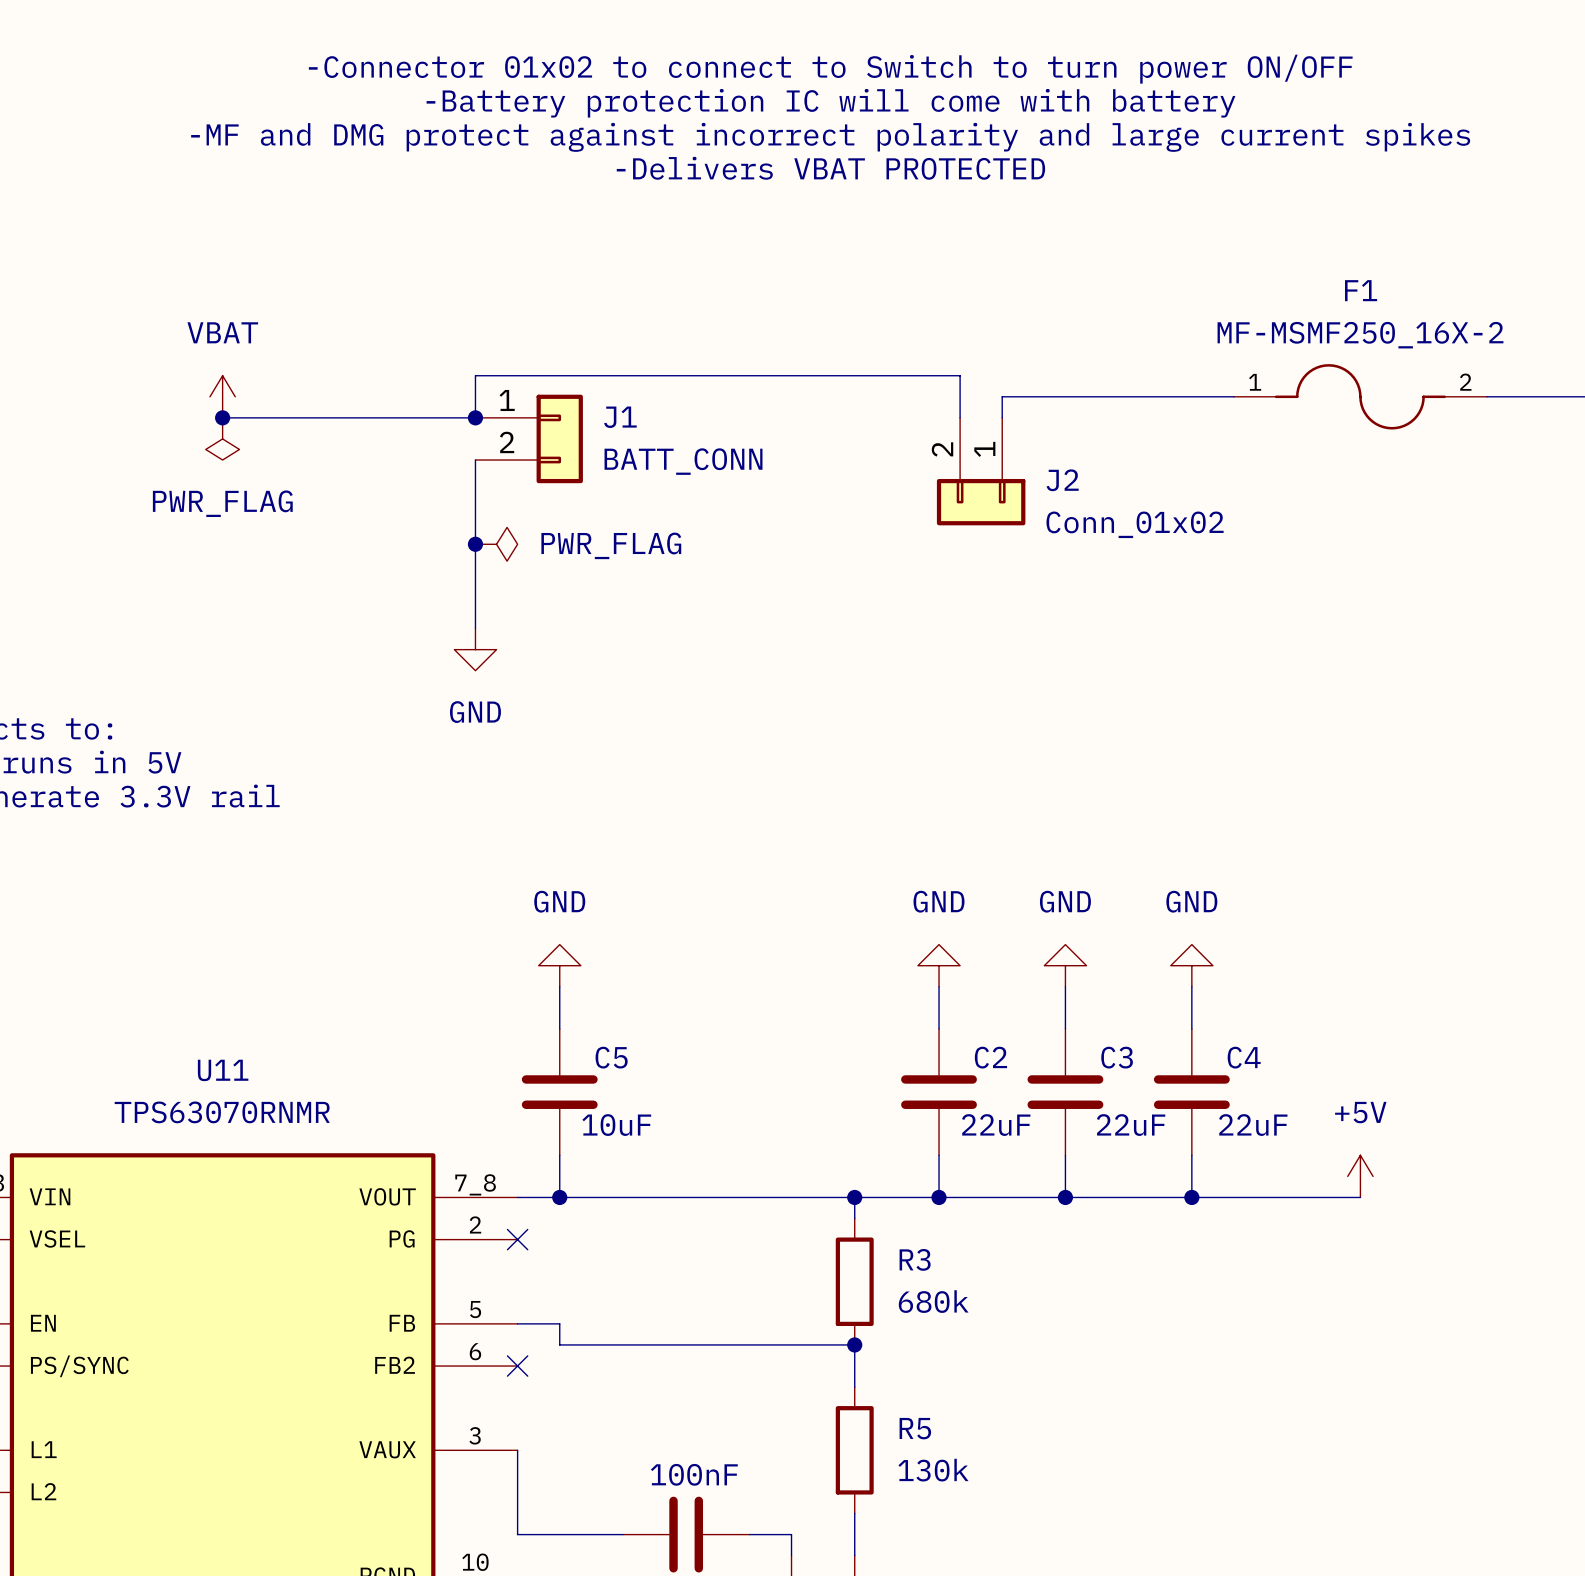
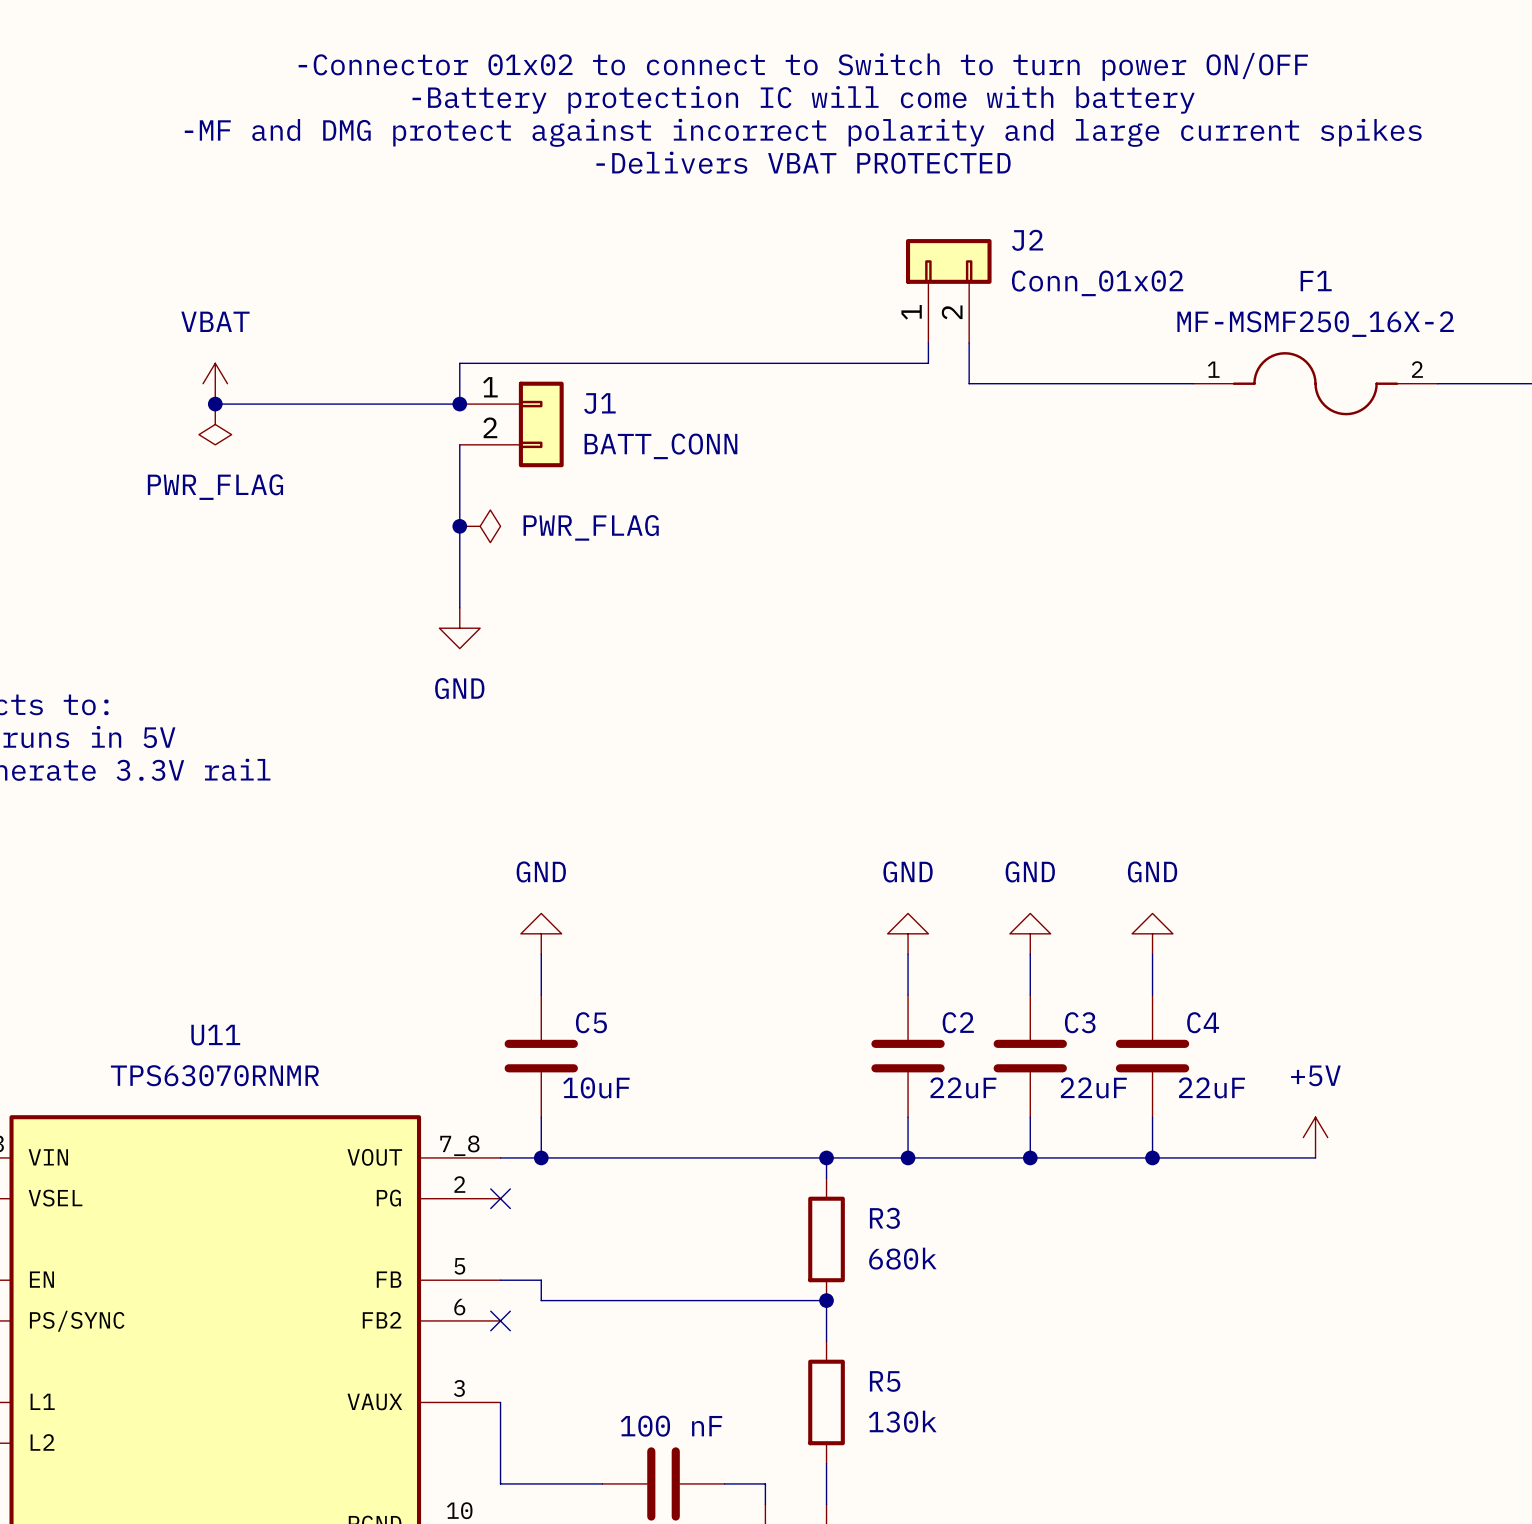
wire: (960, 375) (960, 417) -> (928, 363) (928, 342)
wire: (1002, 396) (1002, 417) -> (969, 383) (969, 342)
J2 position: (981, 471) -> (948, 291)
J2 name position: J2 (1062, 480) -> J2 (1027, 240)
J2 rotation: 0° (981, 502) -> 180° (948, 261)
J2 value position: Conn_01x02 (1135, 524) -> Conn_01x02 (1097, 283)
part value: 100nF (694, 1474) -> 100 nF (671, 1426)

